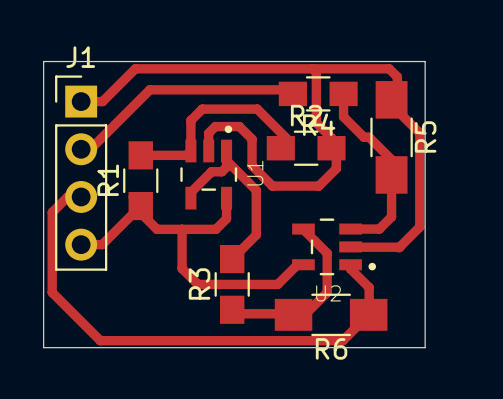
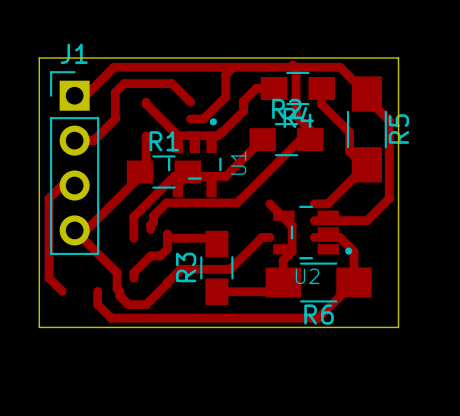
top track: none -> (233, 67) (225, 74) (225, 96) (203, 118) (190, 118)
top track: (292, 93) (288, 89) (149, 89) (90, 149) -> (273, 88) (256, 88) (243, 101) (243, 111) (217, 135) (177, 135) (146, 102)
top track: none -> (362, 94) (389, 120) (389, 198) (367, 220) (314, 220)
top track: (391, 99) (391, 104) (419, 133) (419, 227) (398, 247) -> none
top track: (397, 99) (397, 77) (389, 68) (135, 68) (102, 101) (92, 101) -> (366, 94) (340, 67) (113, 67) (85, 95)
top track: none -> (190, 102) (171, 83) (124, 83) (115, 92) (115, 118) (93, 140) (83, 140)
top track: (343, 110) (343, 116) (363, 137) (369, 137) (391, 159) (391, 216) (379, 229) (350, 229) -> (321, 104) (349, 132) (349, 151) (362, 164)
top track: (286, 138) (257, 109) (202, 109) (190, 120) (190, 151) (186, 155) (140, 155) -> none
top track: none -> (262, 139) (225, 176) (174, 176) (133, 216) (133, 238)
top track: none -> (310, 139) (300, 139) (237, 202) (166, 202) (153, 216) (150, 229)
top track: (208, 151) (208, 133) (215, 126) (239, 126) (252, 139) (252, 165) (272, 186) (318, 186) (336, 168) (336, 156) -> none
top track: (226, 151) (226, 166) (221, 171) (211, 171) (190, 192) (190, 198) -> none
top track: (226, 160) (256, 190) (256, 234) (232, 259) -> (167, 238) (211, 238) (216, 244)
top track: none -> (366, 164) (327, 203) (314, 203)
R1 rotation: 0° (140, 180) -> 90° clockwise (163, 172)
top track: (132, 196) (134, 207) (157, 229) (215, 229) (226, 218) (226, 198) -> none
top track: (140, 206) (102, 244) (93, 244) -> (146, 135) (146, 170) (86, 230)
top track: (53, 210) (52, 212) (52, 292) (100, 340) (342, 340) (368, 314) -> (49, 198) (49, 278) (62, 291)
top track: none -> (269, 203) (292, 226) (292, 251) (283, 260) (283, 282) (274, 291) (216, 291)
top track: (182, 229) (182, 268) (197, 284) (277, 284) (297, 264) (303, 264) -> none
top track: (303, 229) (327, 253) (327, 292) (294, 325) (282, 313) (241, 313) -> none
top track: none -> (74, 230) (117, 272) (117, 288) (119, 291) (119, 295) (128, 304) (146, 304) (180, 269) (230, 269) (262, 237) (269, 237)
top track: (351, 247) (400, 247) -> none
top track: none -> (167, 233) (167, 248) (160, 255) (150, 255) (133, 272) (133, 278)
top track: none -> (314, 237) (339, 237) (353, 251) (353, 282) (318, 318) (111, 318) (97, 304) (97, 291)
top track: (350, 264) (350, 268) (369, 287) (369, 325) -> none
R6 position: (331, 314) -> (318, 282)

